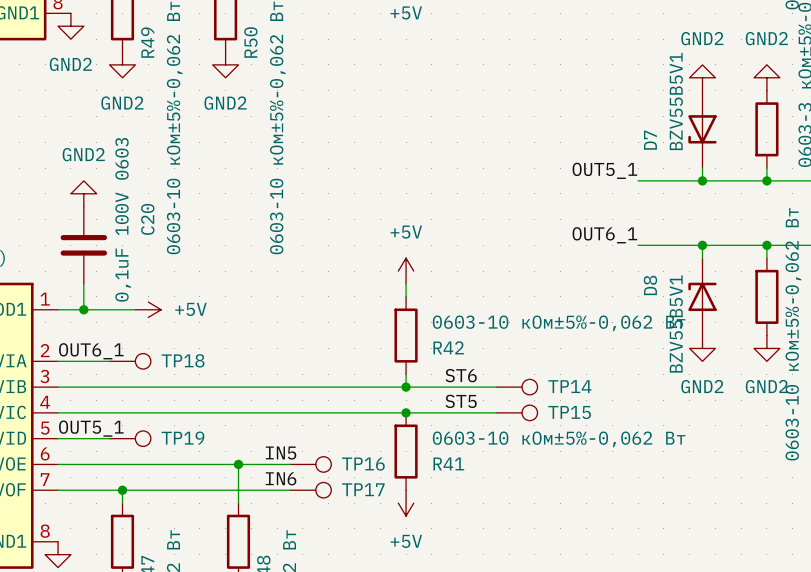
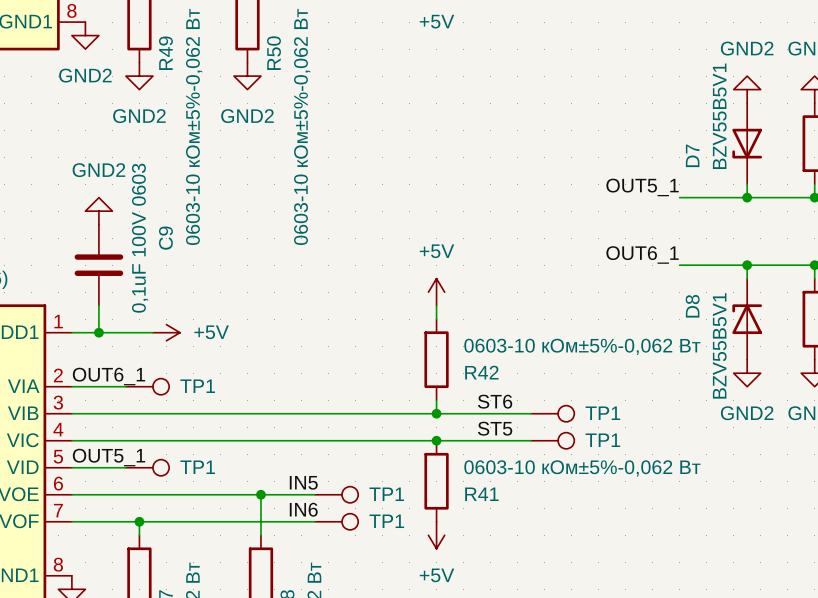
C20 name: C20 (147, 219) -> C9 (165, 238)
TP18 name: TP18 (183, 360) -> TP1 (197, 386)
TP14 name: TP14 (569, 386) -> TP1 (602, 413)
TP15 name: TP15 (569, 412) -> TP1 (602, 440)
TP19 name: TP19 (182, 438) -> TP1 (197, 467)
TP16 name: TP16 (363, 464) -> TP1 (386, 494)
TP17 name: TP17 (363, 489) -> TP1 (386, 521)

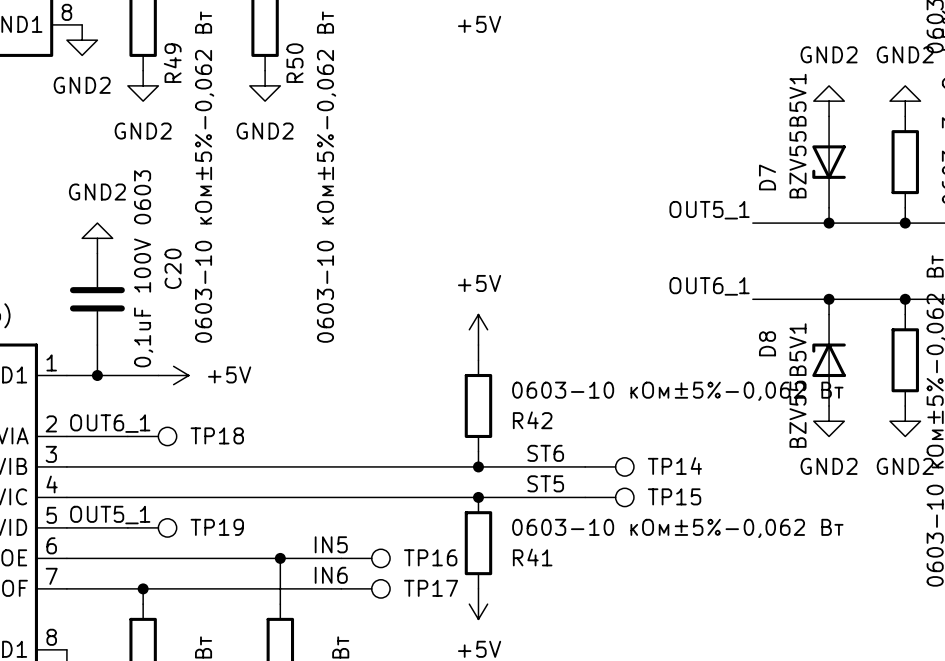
C9 name: C9 (165, 238) -> C20 (173, 268)
TP1 name: TP1 (197, 386) -> TP18 (217, 435)
TP1 name: TP1 (602, 413) -> TP14 (674, 466)
TP1 name: TP1 (602, 440) -> TP15 (674, 496)
TP1 name: TP1 (197, 467) -> TP19 (217, 527)
TP1 name: TP1 (386, 494) -> TP16 (430, 557)
TP1 name: TP1 (386, 521) -> TP17 (431, 588)

